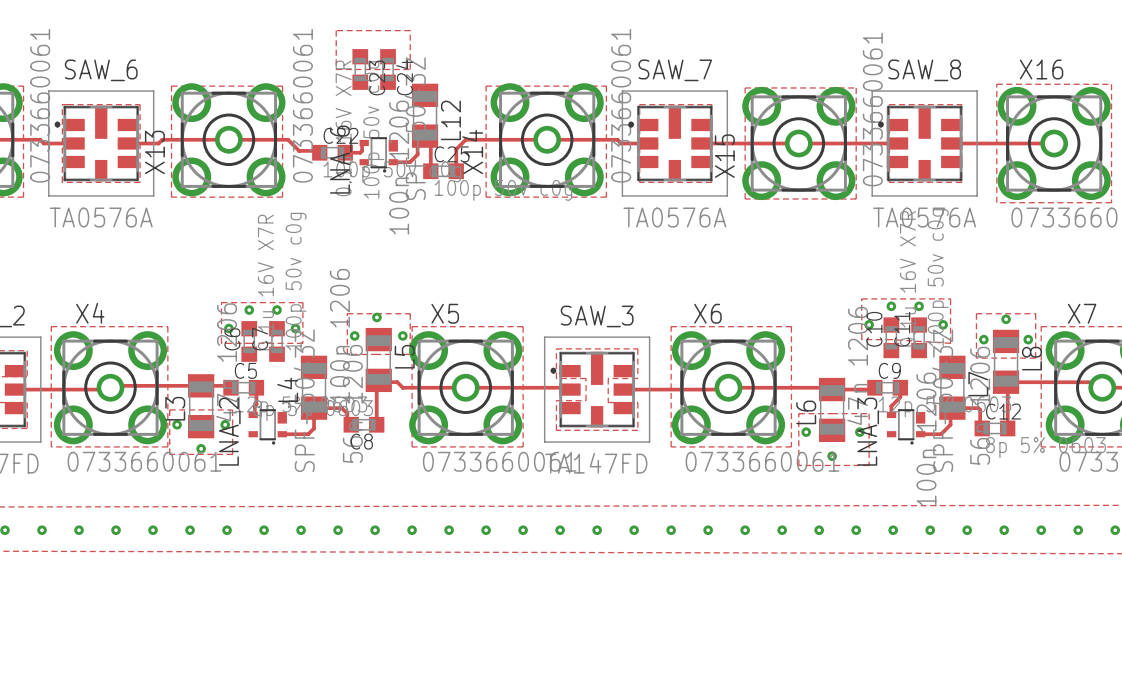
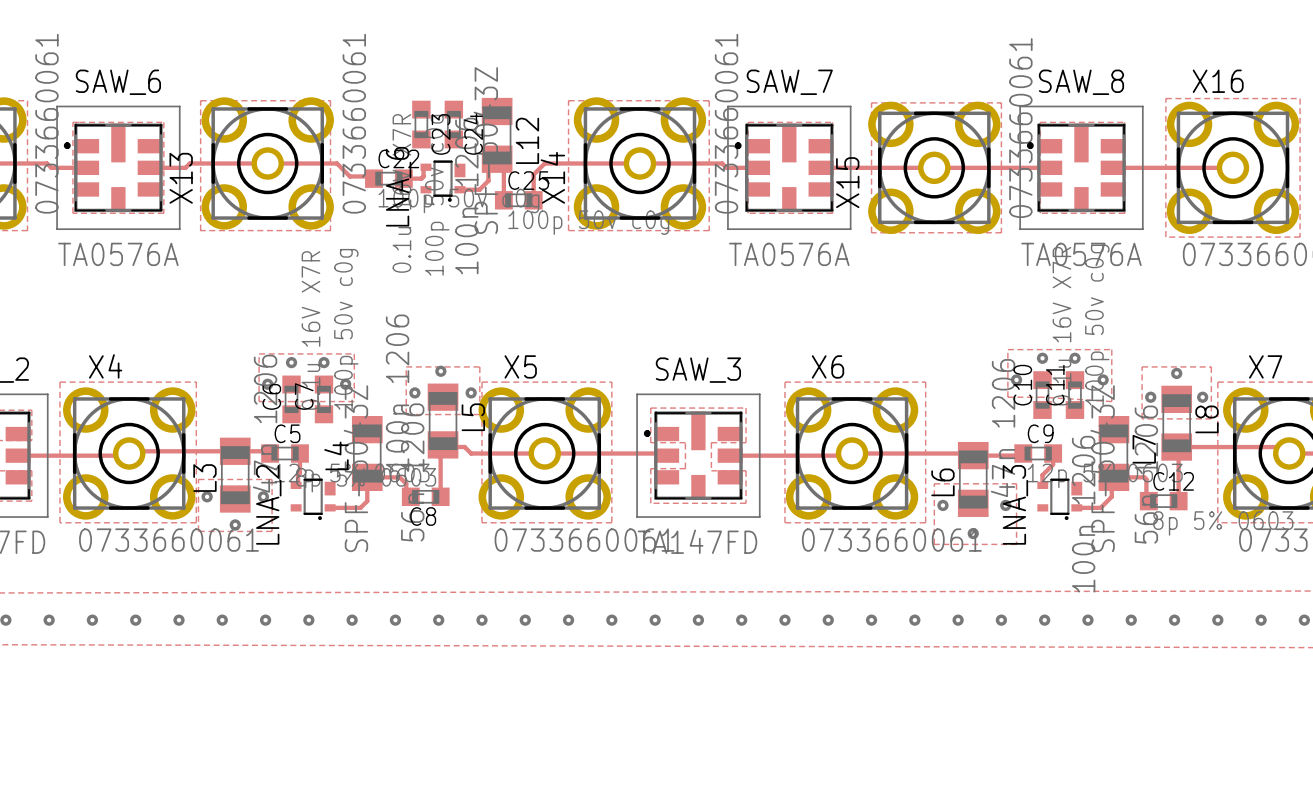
top zone outline: (336, 30) (410, 30) (410, 69) (336, 69) (336, 30) -> none
C23 position: (360, 69) -> (421, 124)
C24 position: (388, 69) -> (453, 124)

